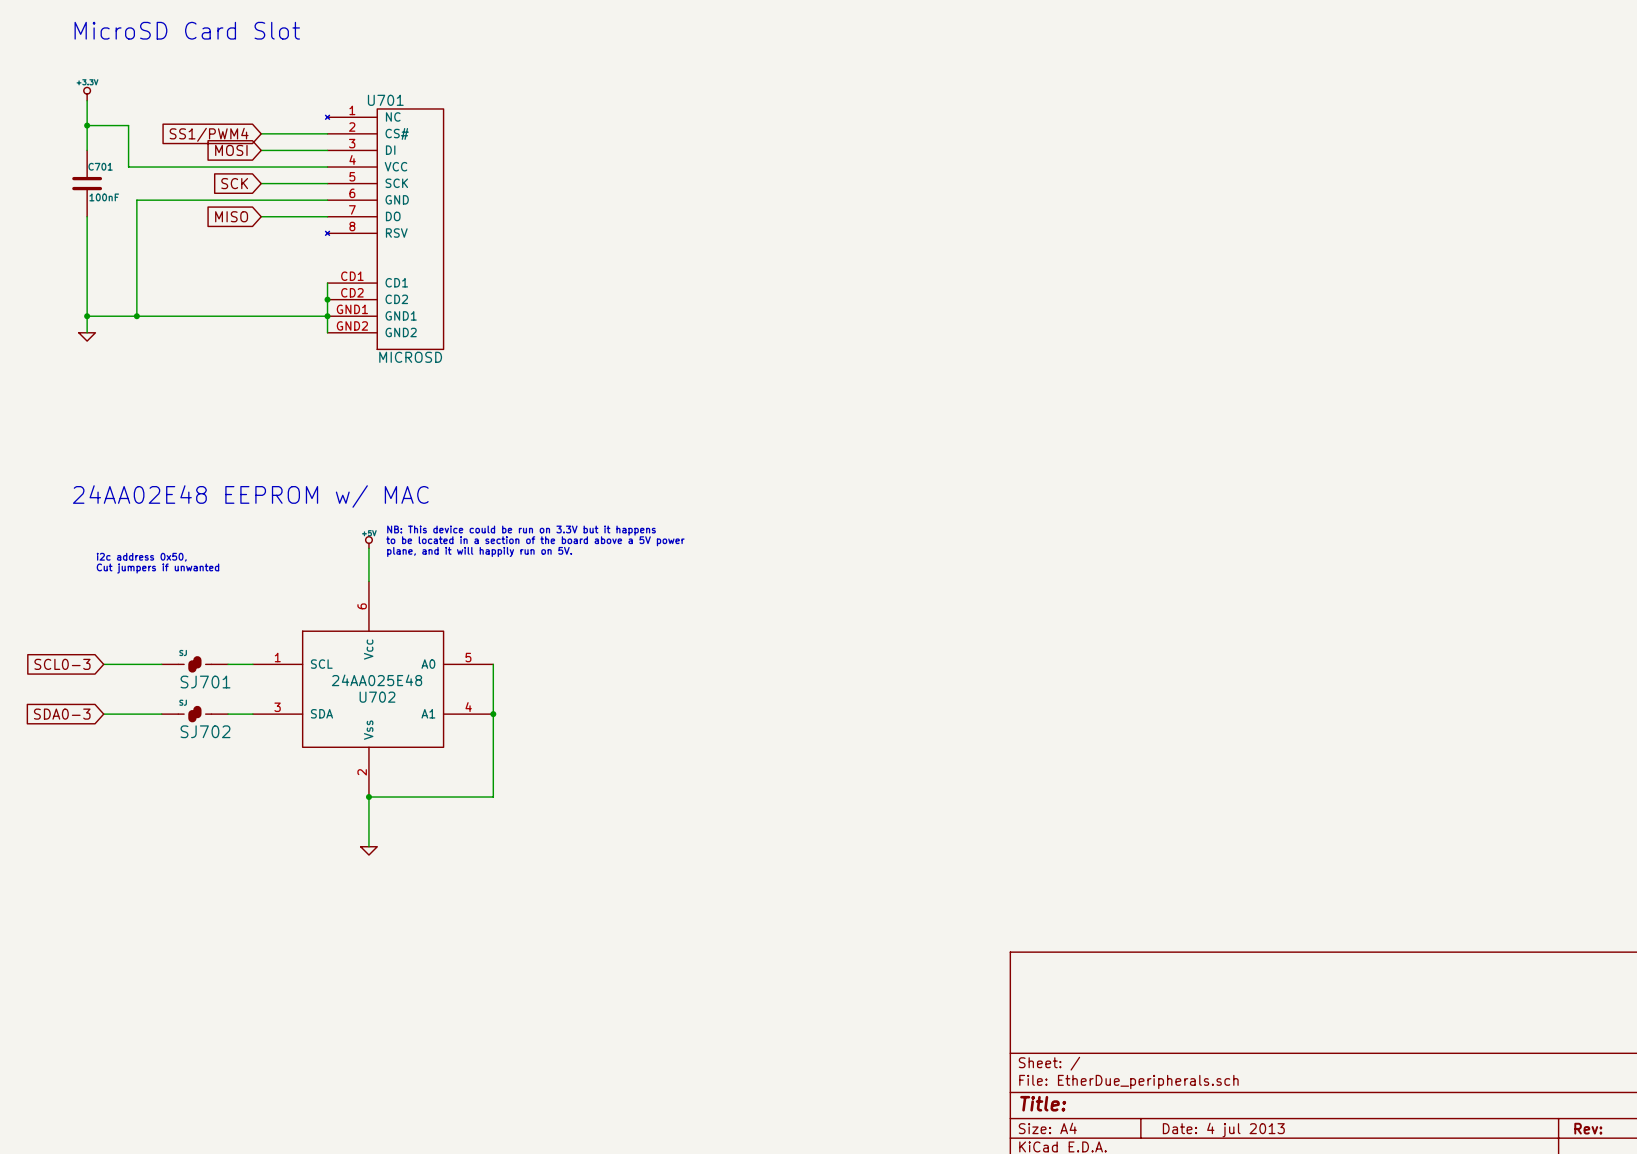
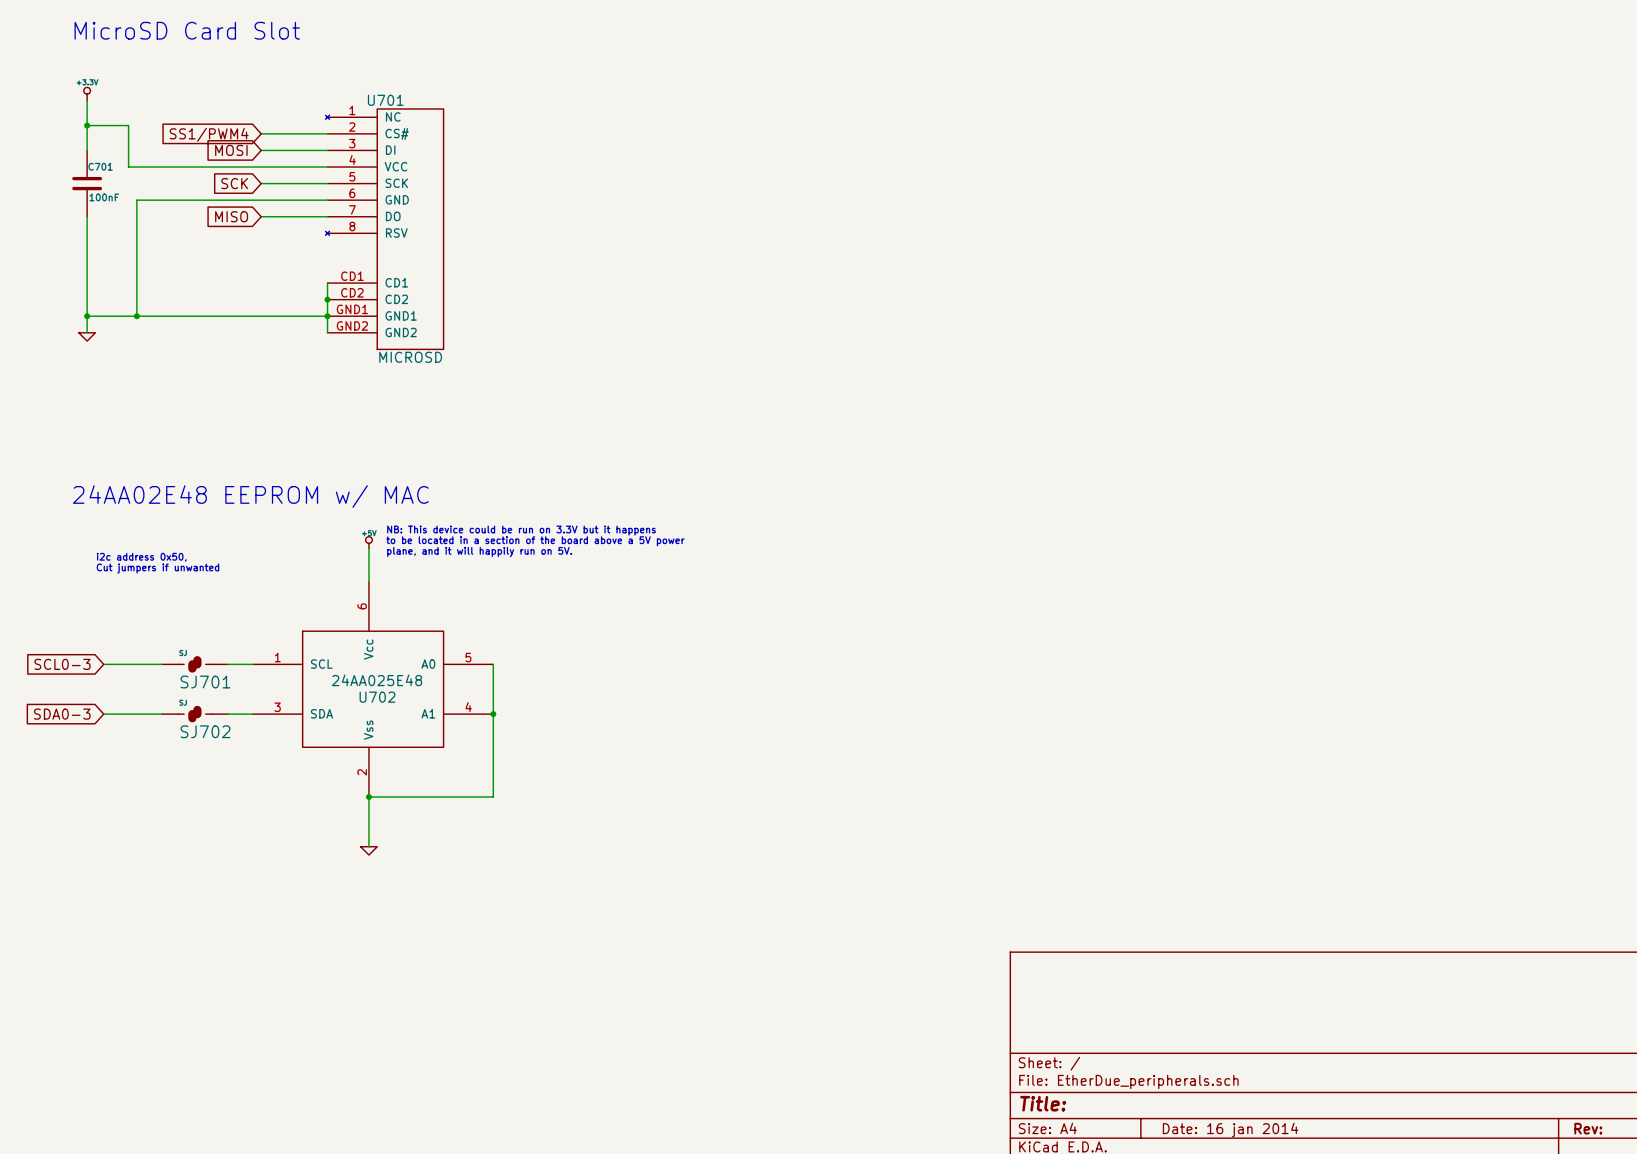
title block: Date: 4 jul 2013 (1223, 1130) -> Date: 16 jan 2014 (1230, 1130)

